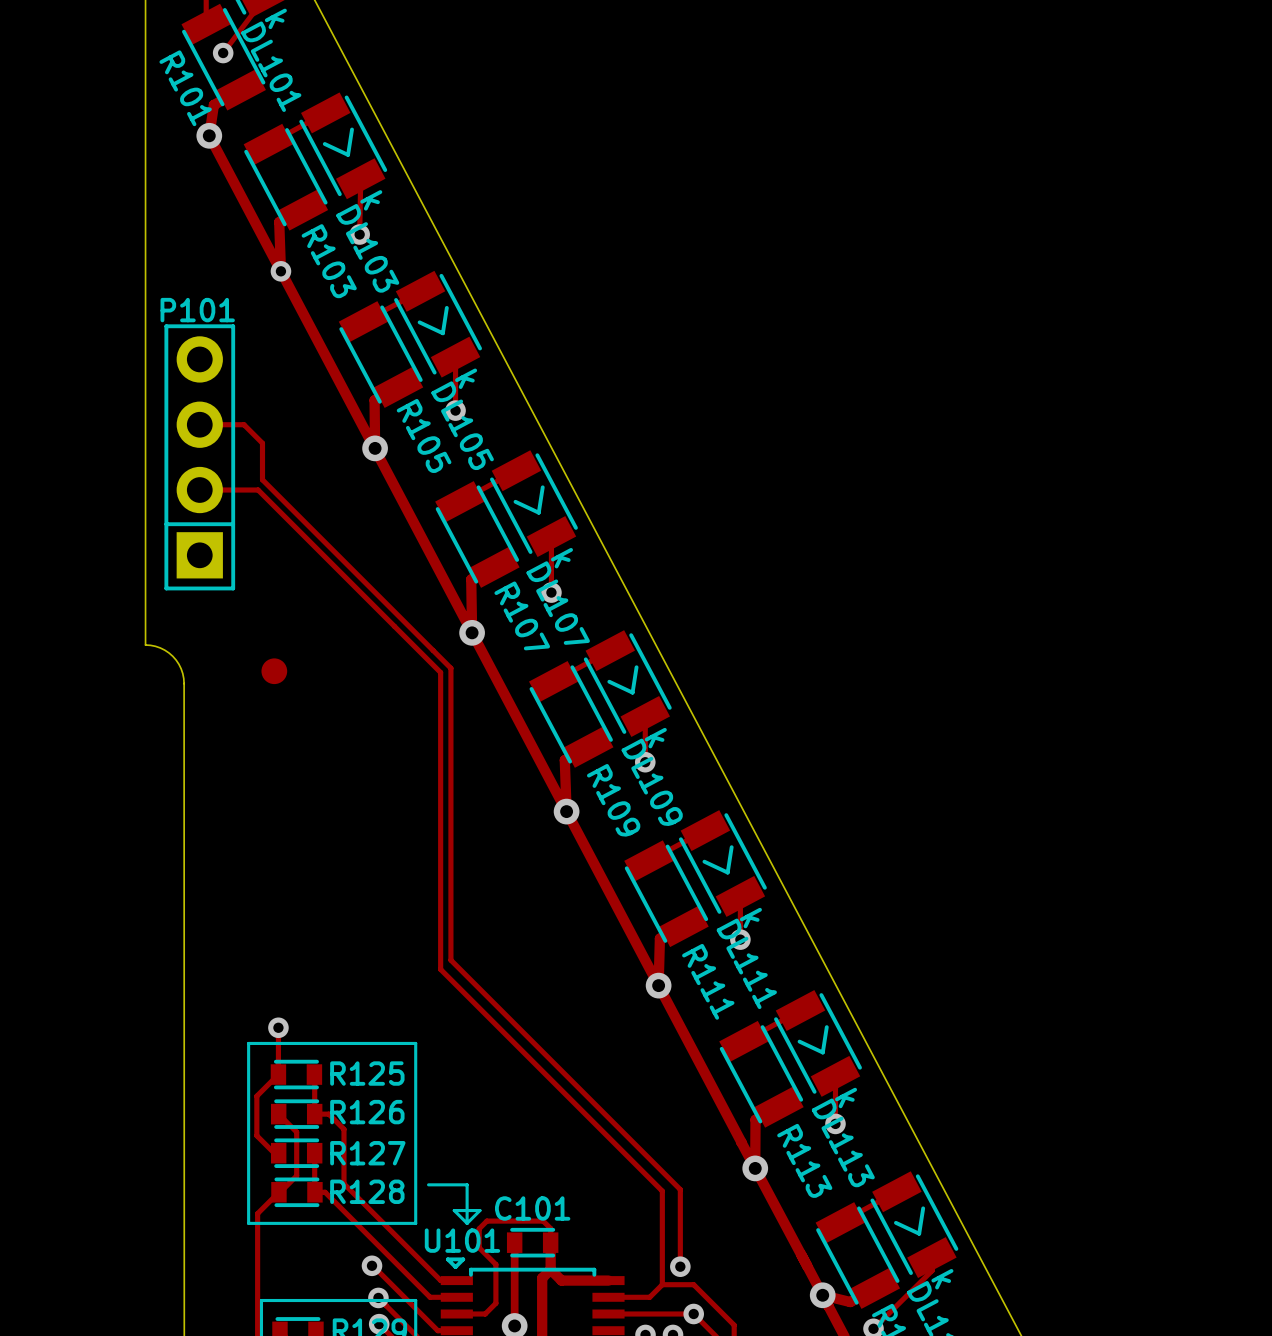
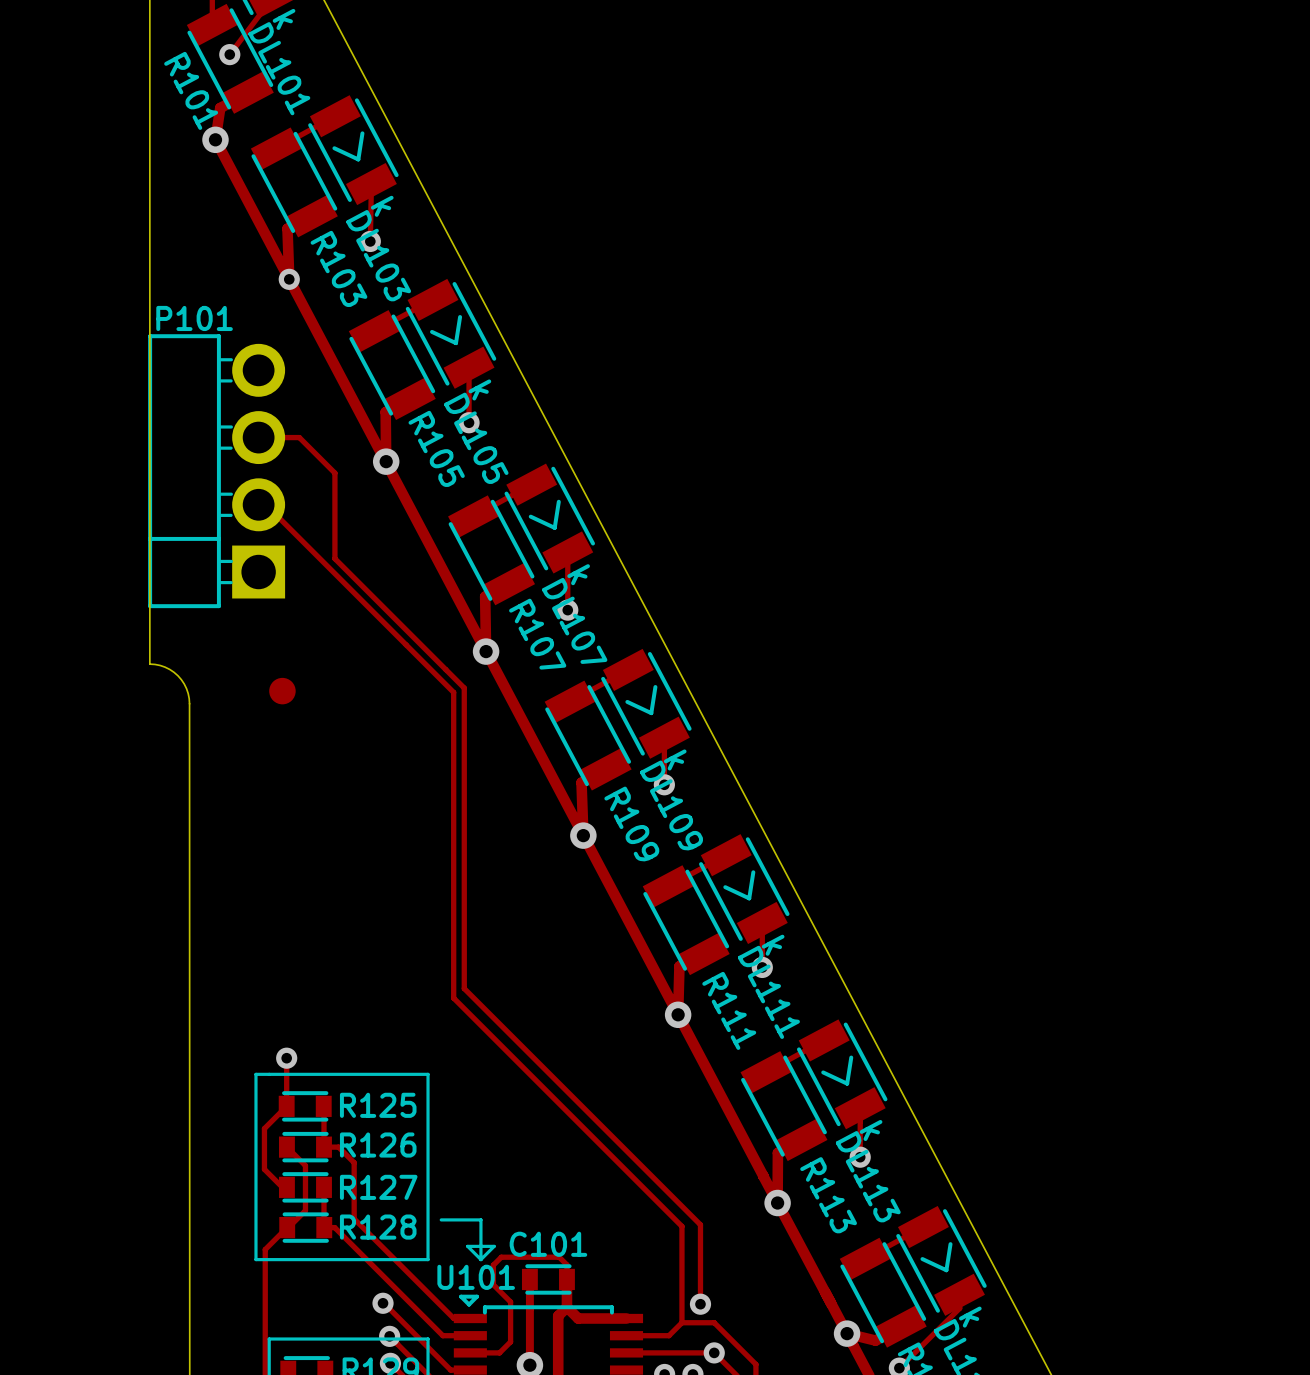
P101 footprint: [164, 324, 236, 591] -> [148, 334, 286, 609]
track: (208, 432) (199, 424) (243, 424) (262, 443) (262, 479) (325, 542) -> (258, 437) (299, 437) (334, 473) (334, 558)
track: (199, 490) (258, 490) -> none

